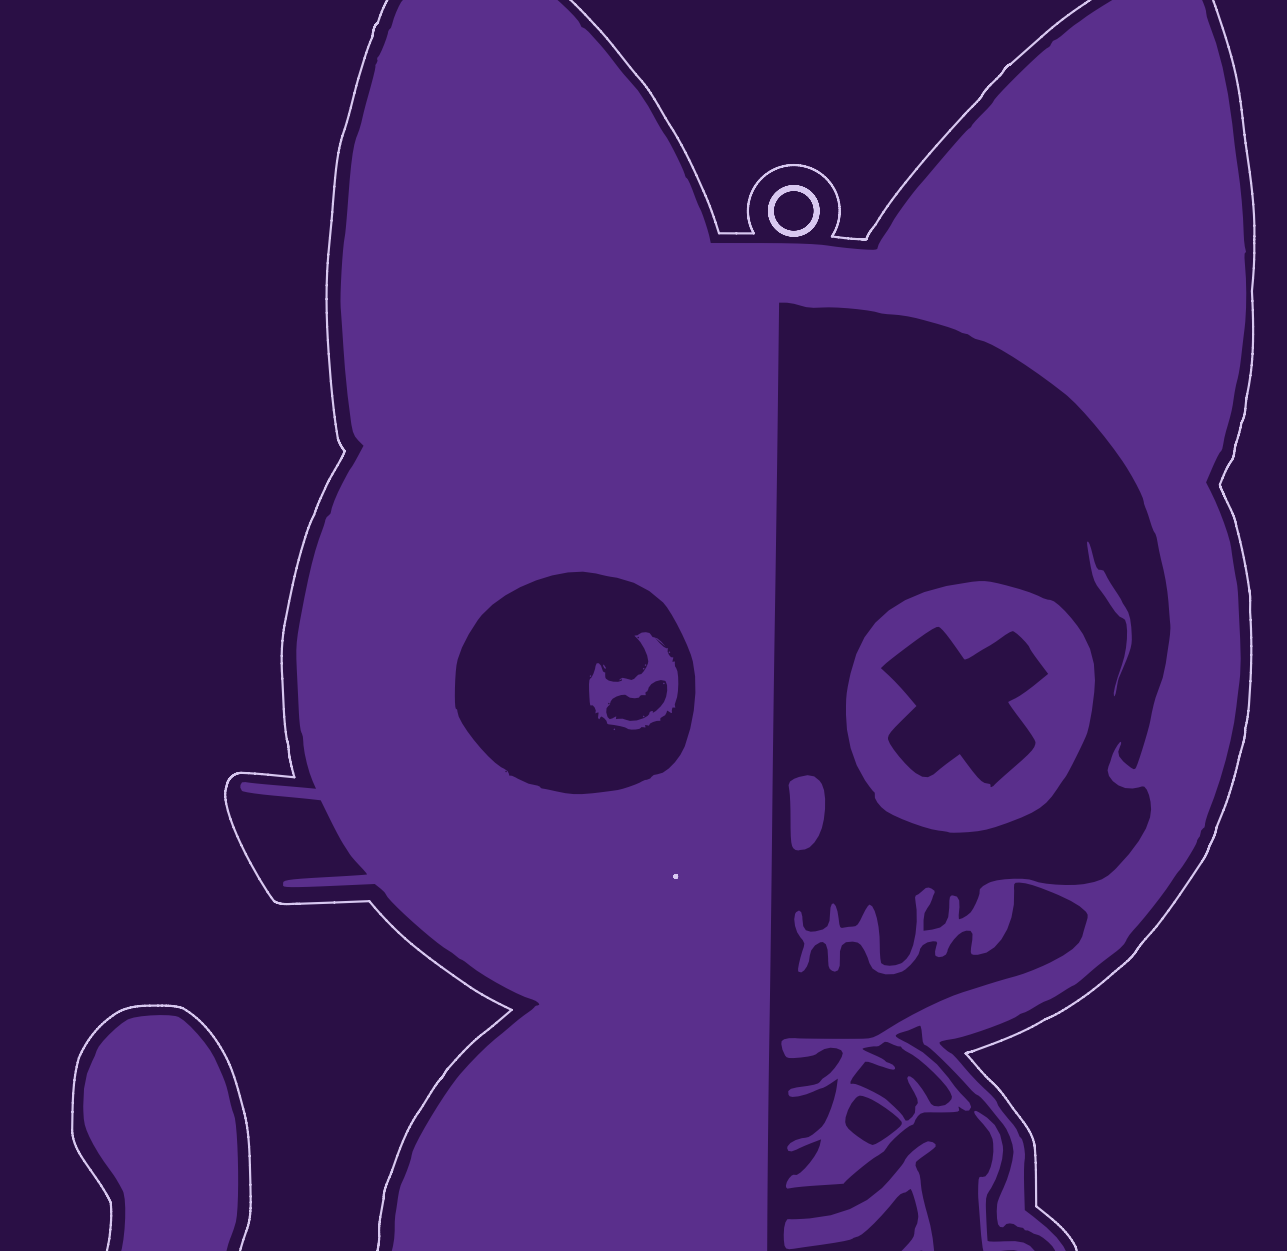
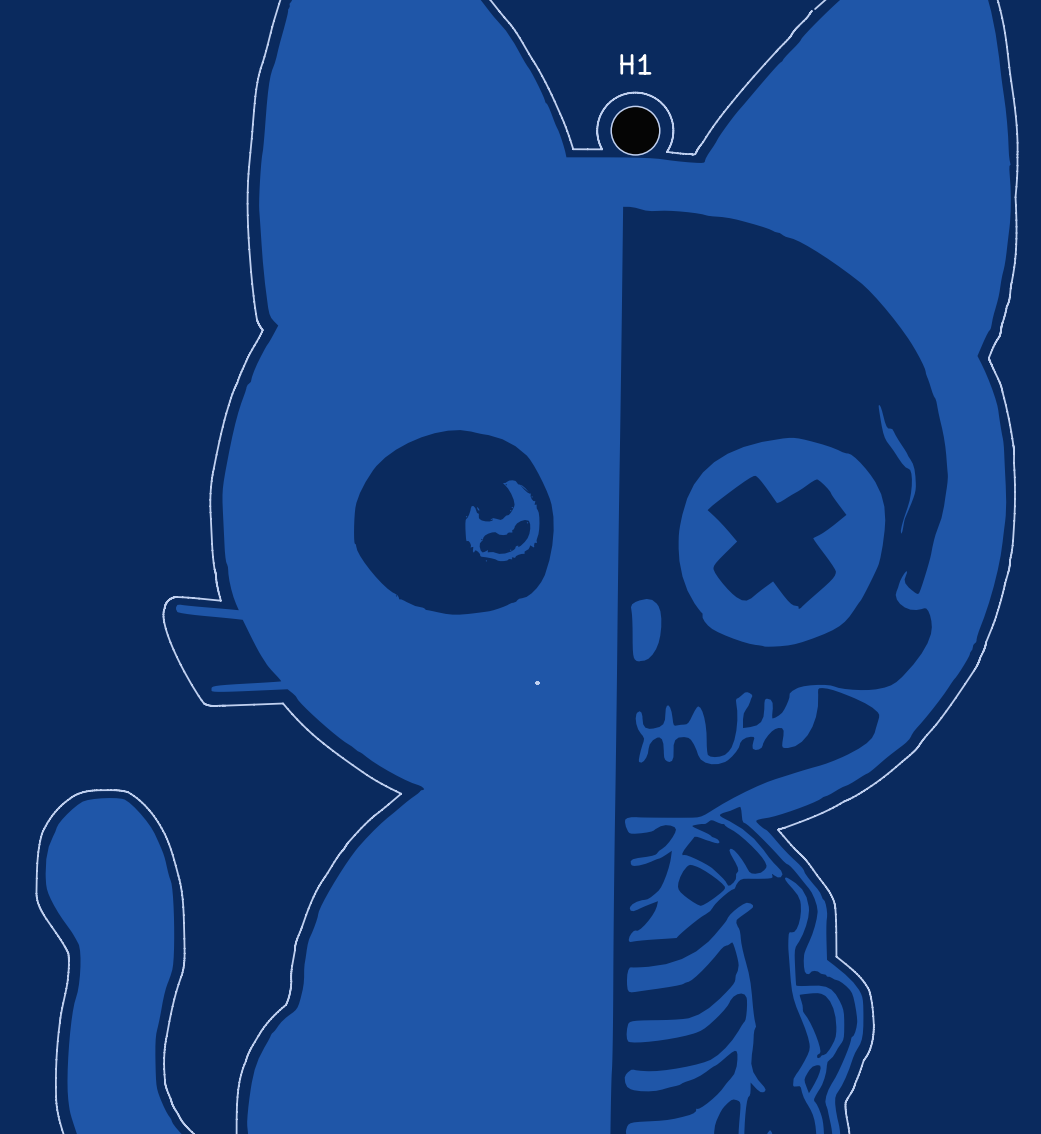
board edge: (791, 188) (782, 190) (776, 196) (771, 204) (770, 213) (773, 221) (779, 228) (786, 232) (796, 233) (804, 231) (811, 225) (815, 217) (816, 208) (813, 199) (808, 193) (800, 189) (791, 188) -> none
H1: none -> (635, 130)

